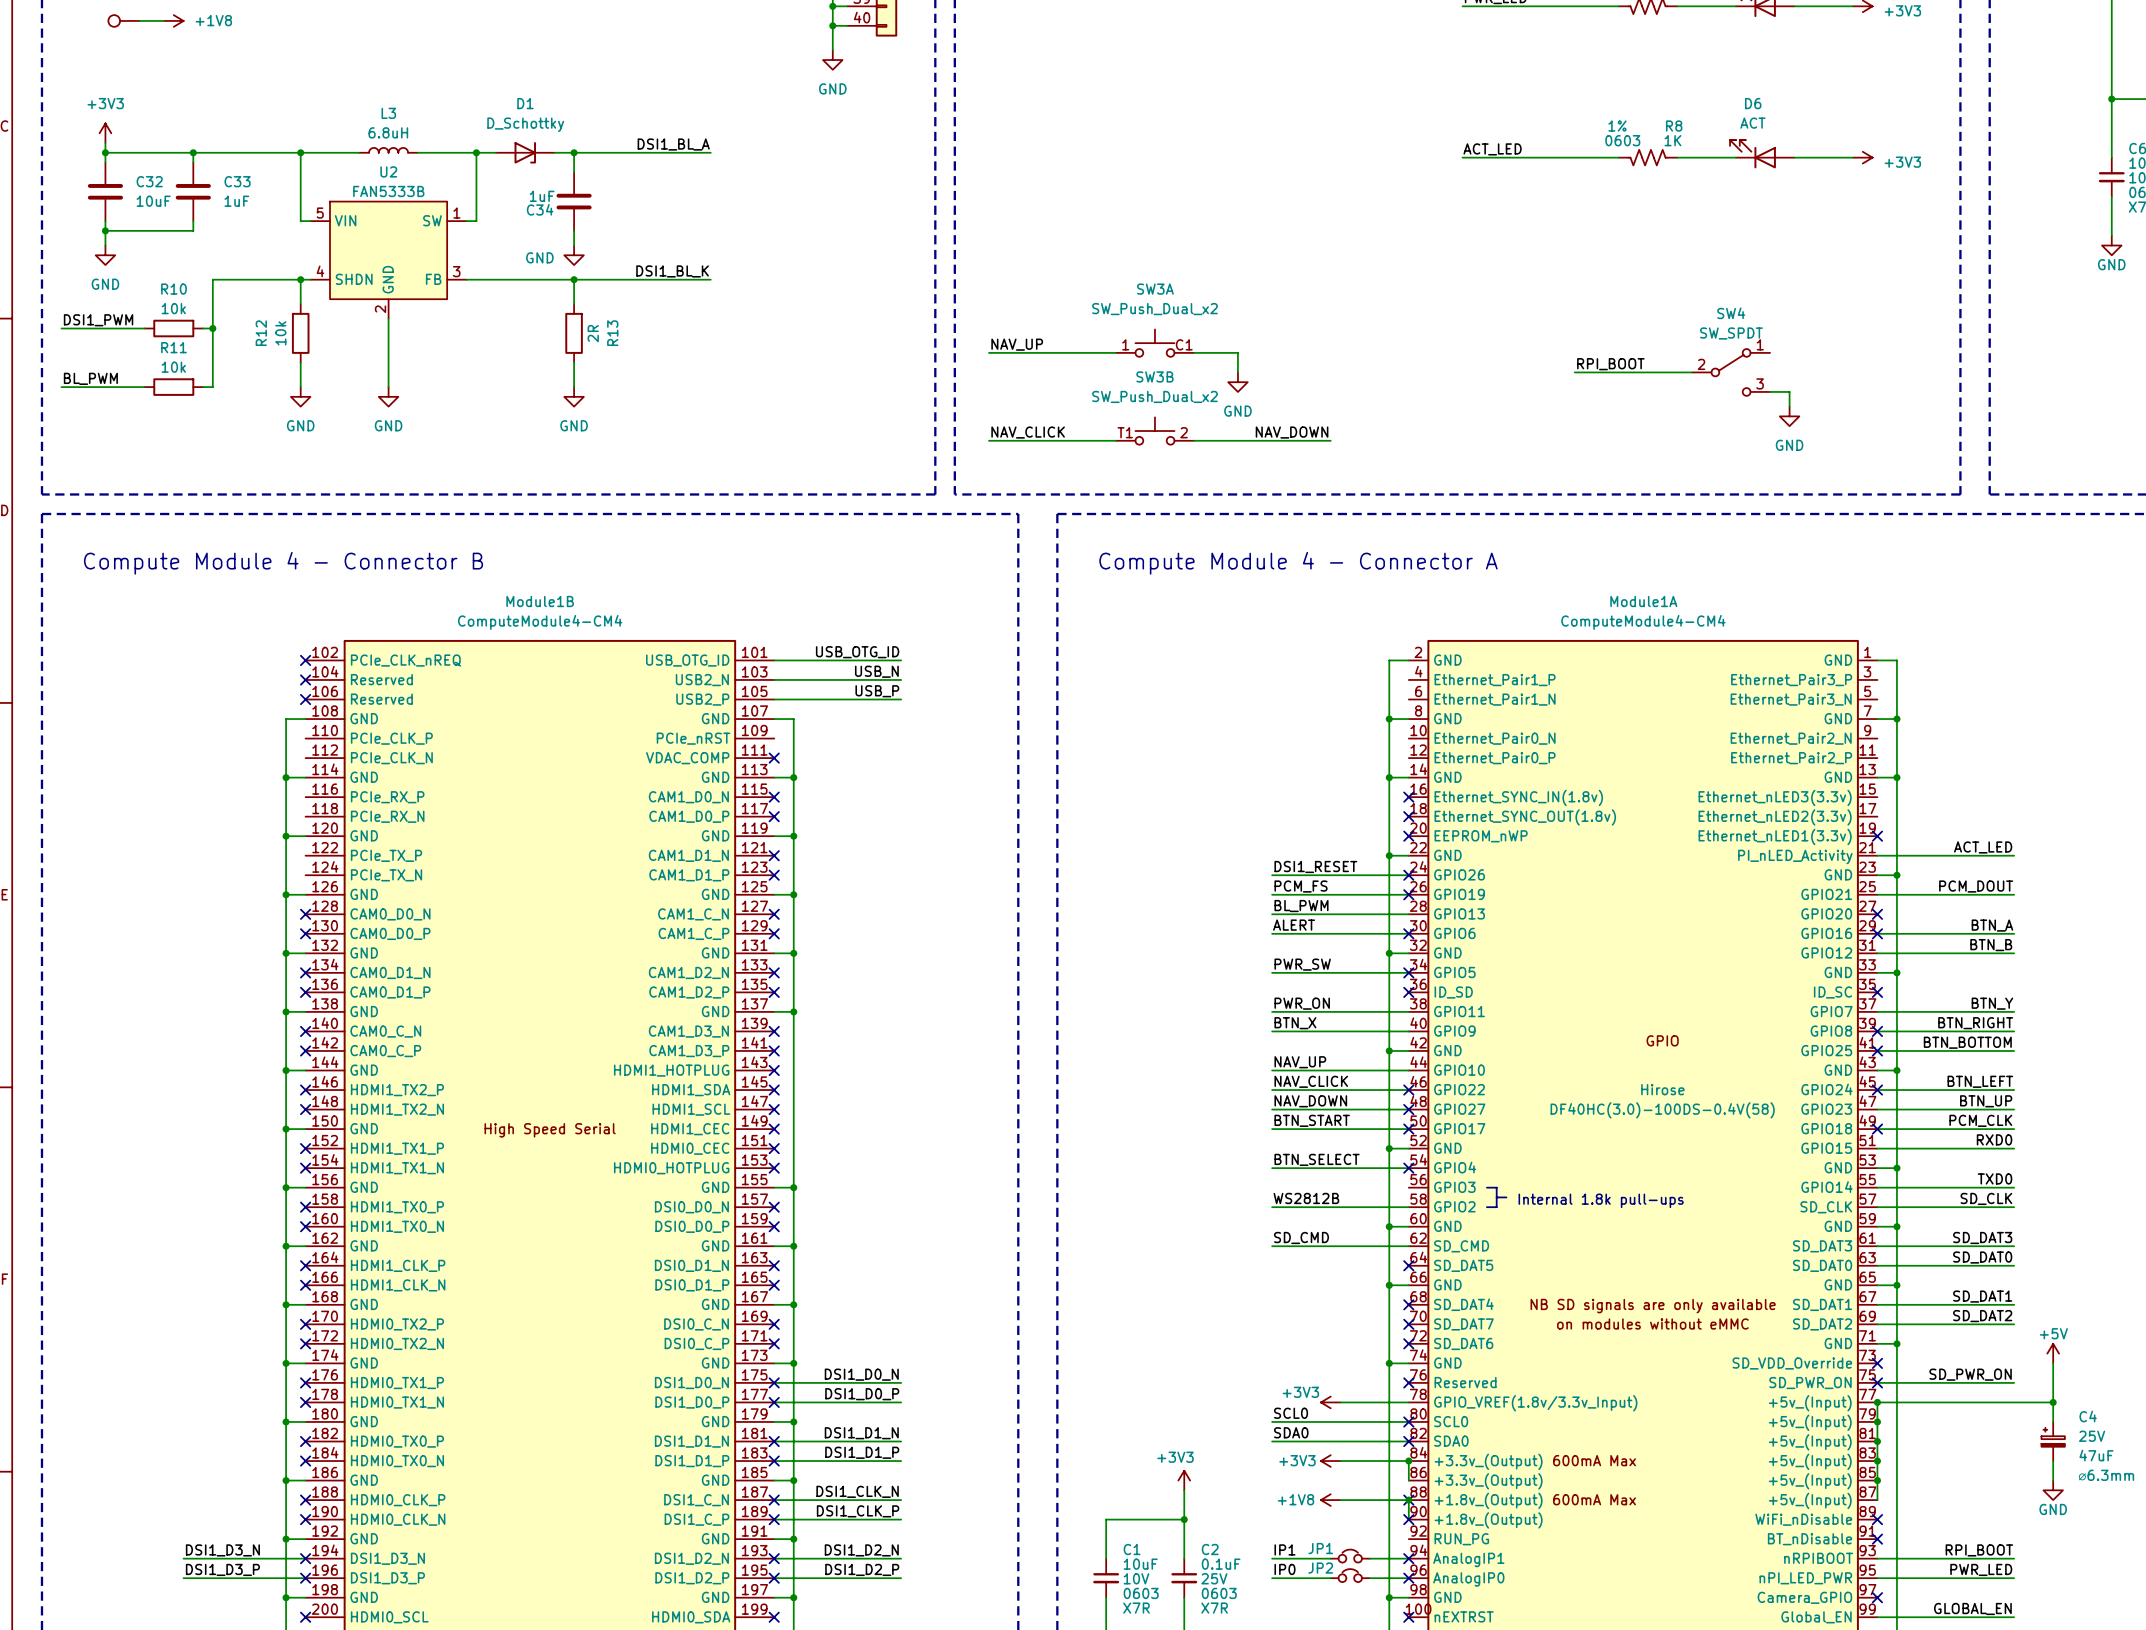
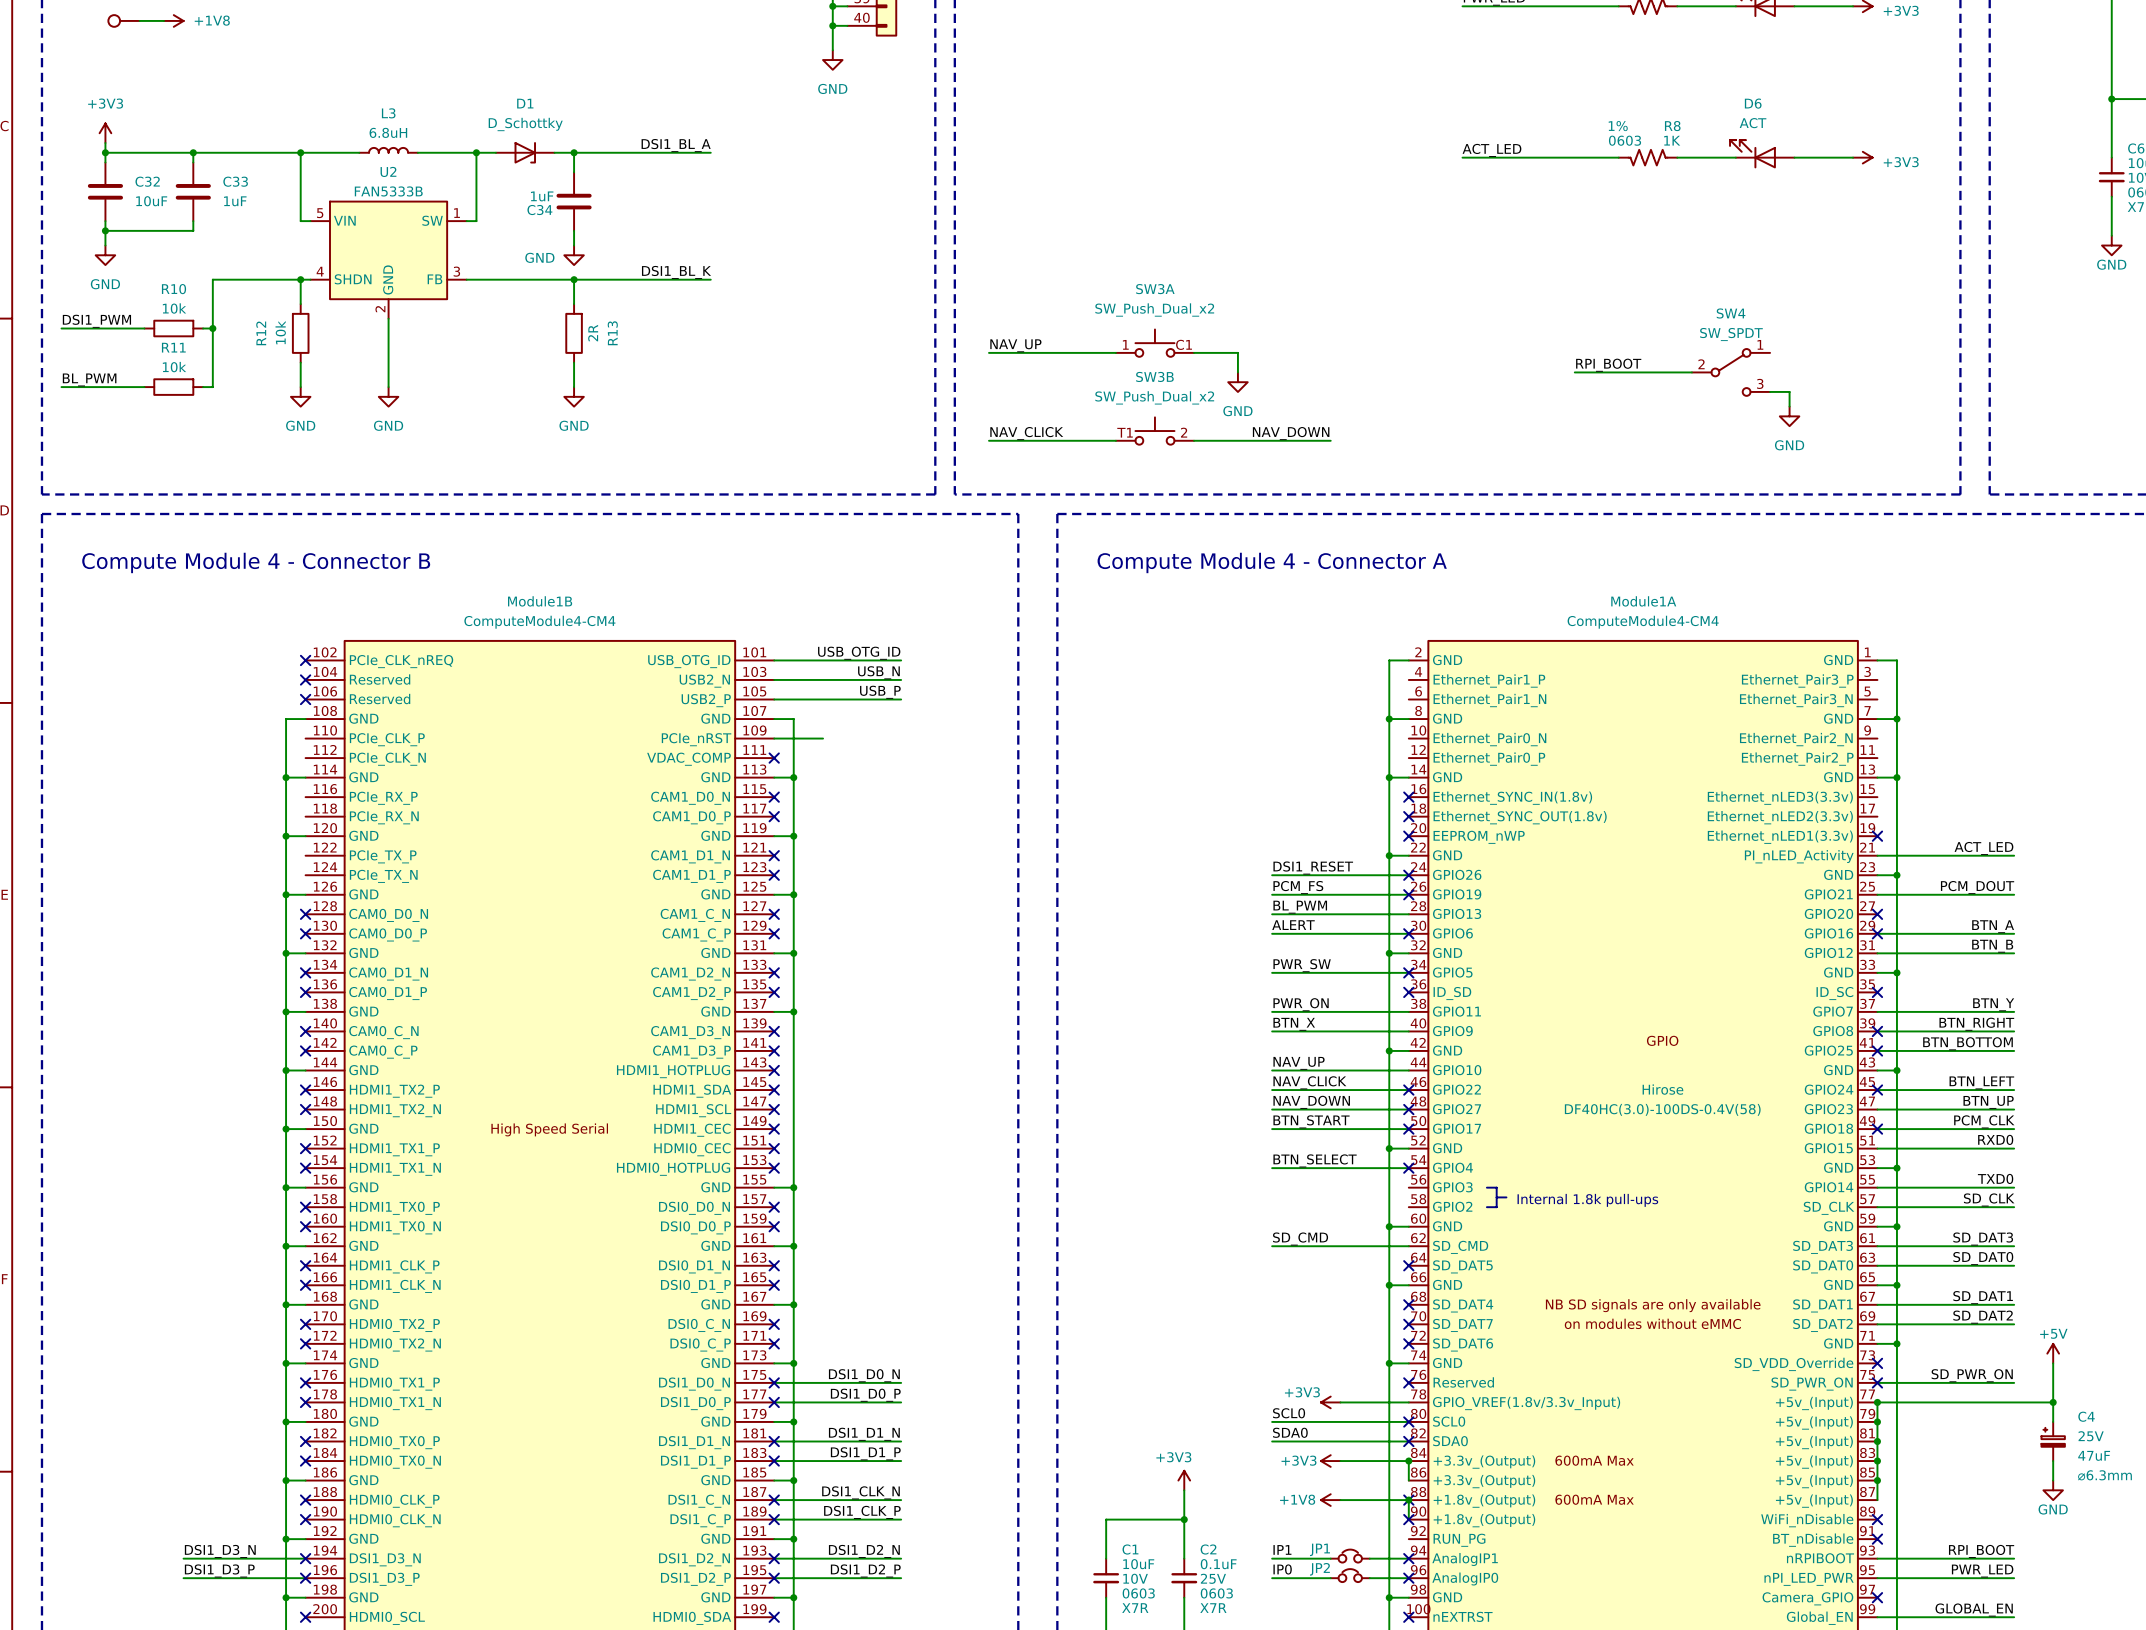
wire: none -> (774, 738) (823, 738)
label: WS2812B (1306, 1198) -> none
wire: (1272, 1207) (1408, 1207) -> none

